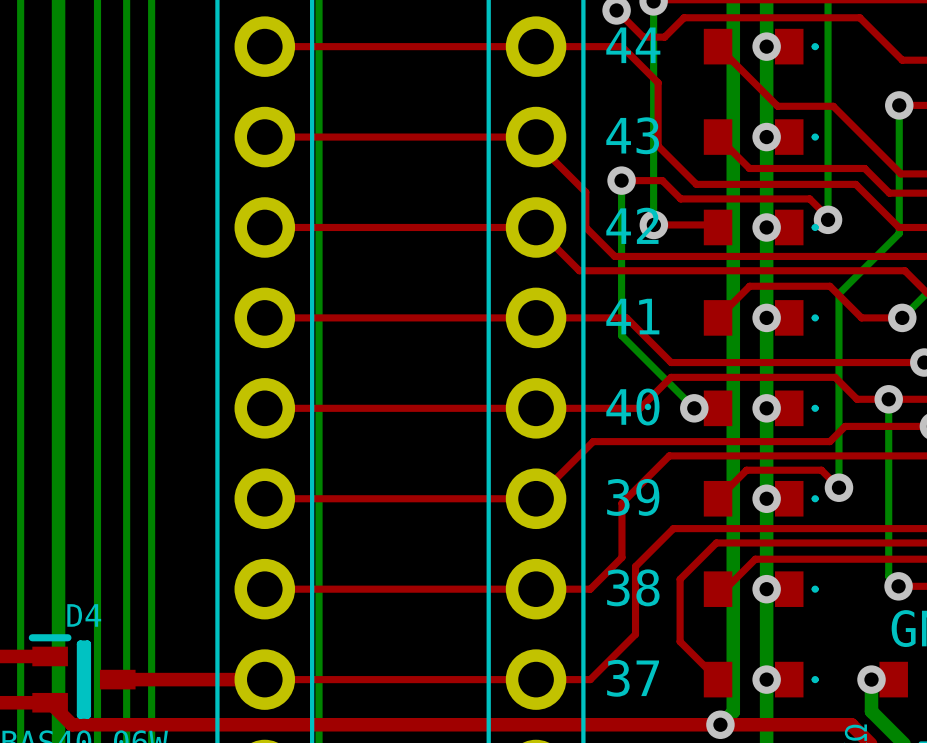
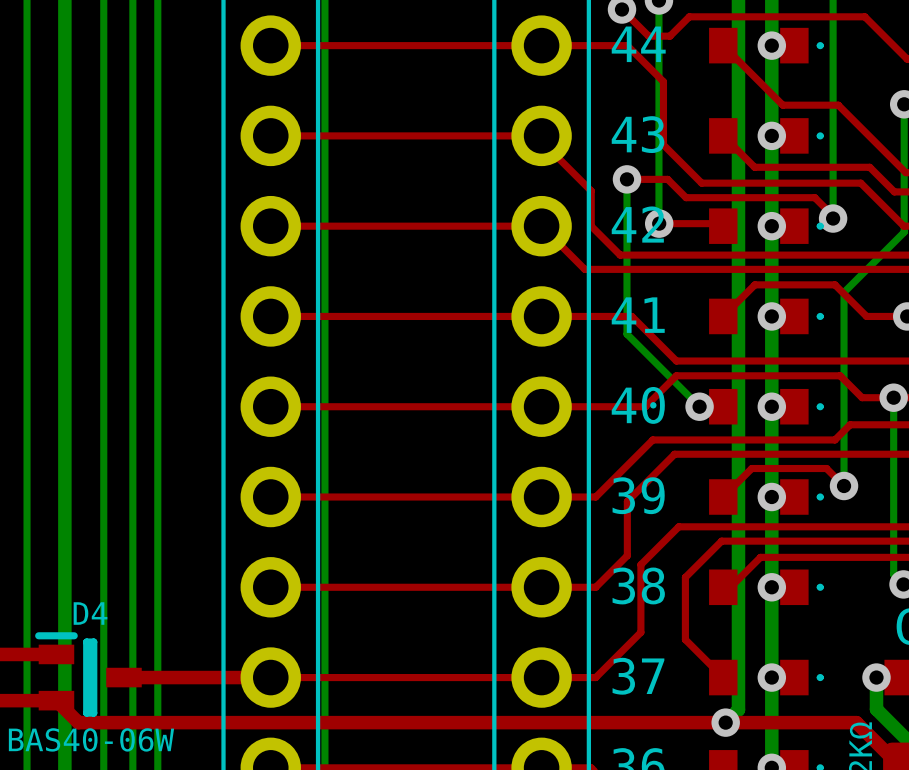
top track: (647, 441) (593, 441) (536, 498) -> (652, 439) (595, 497) (541, 497)

